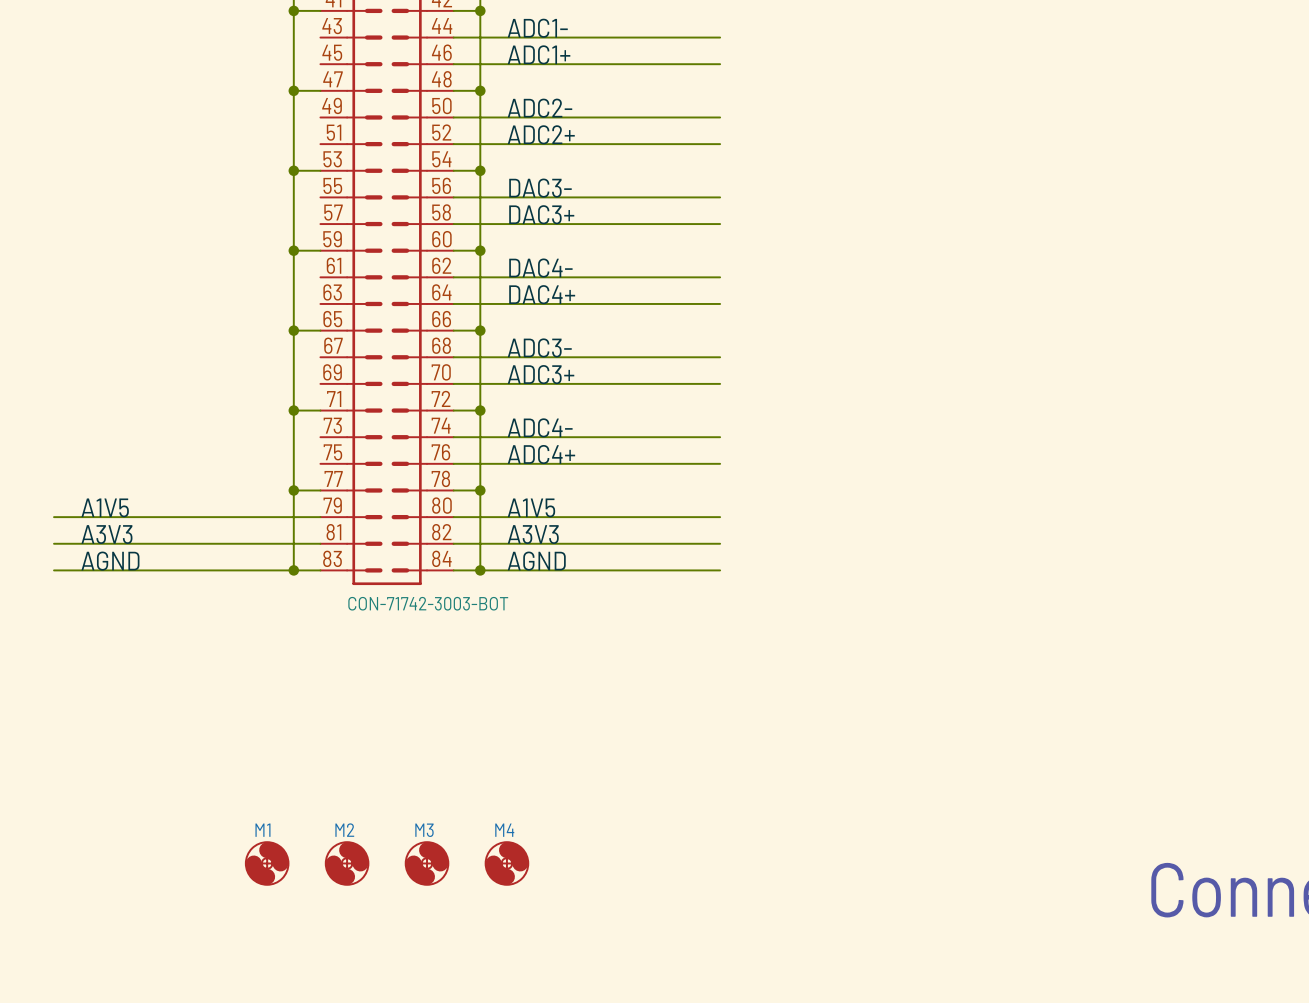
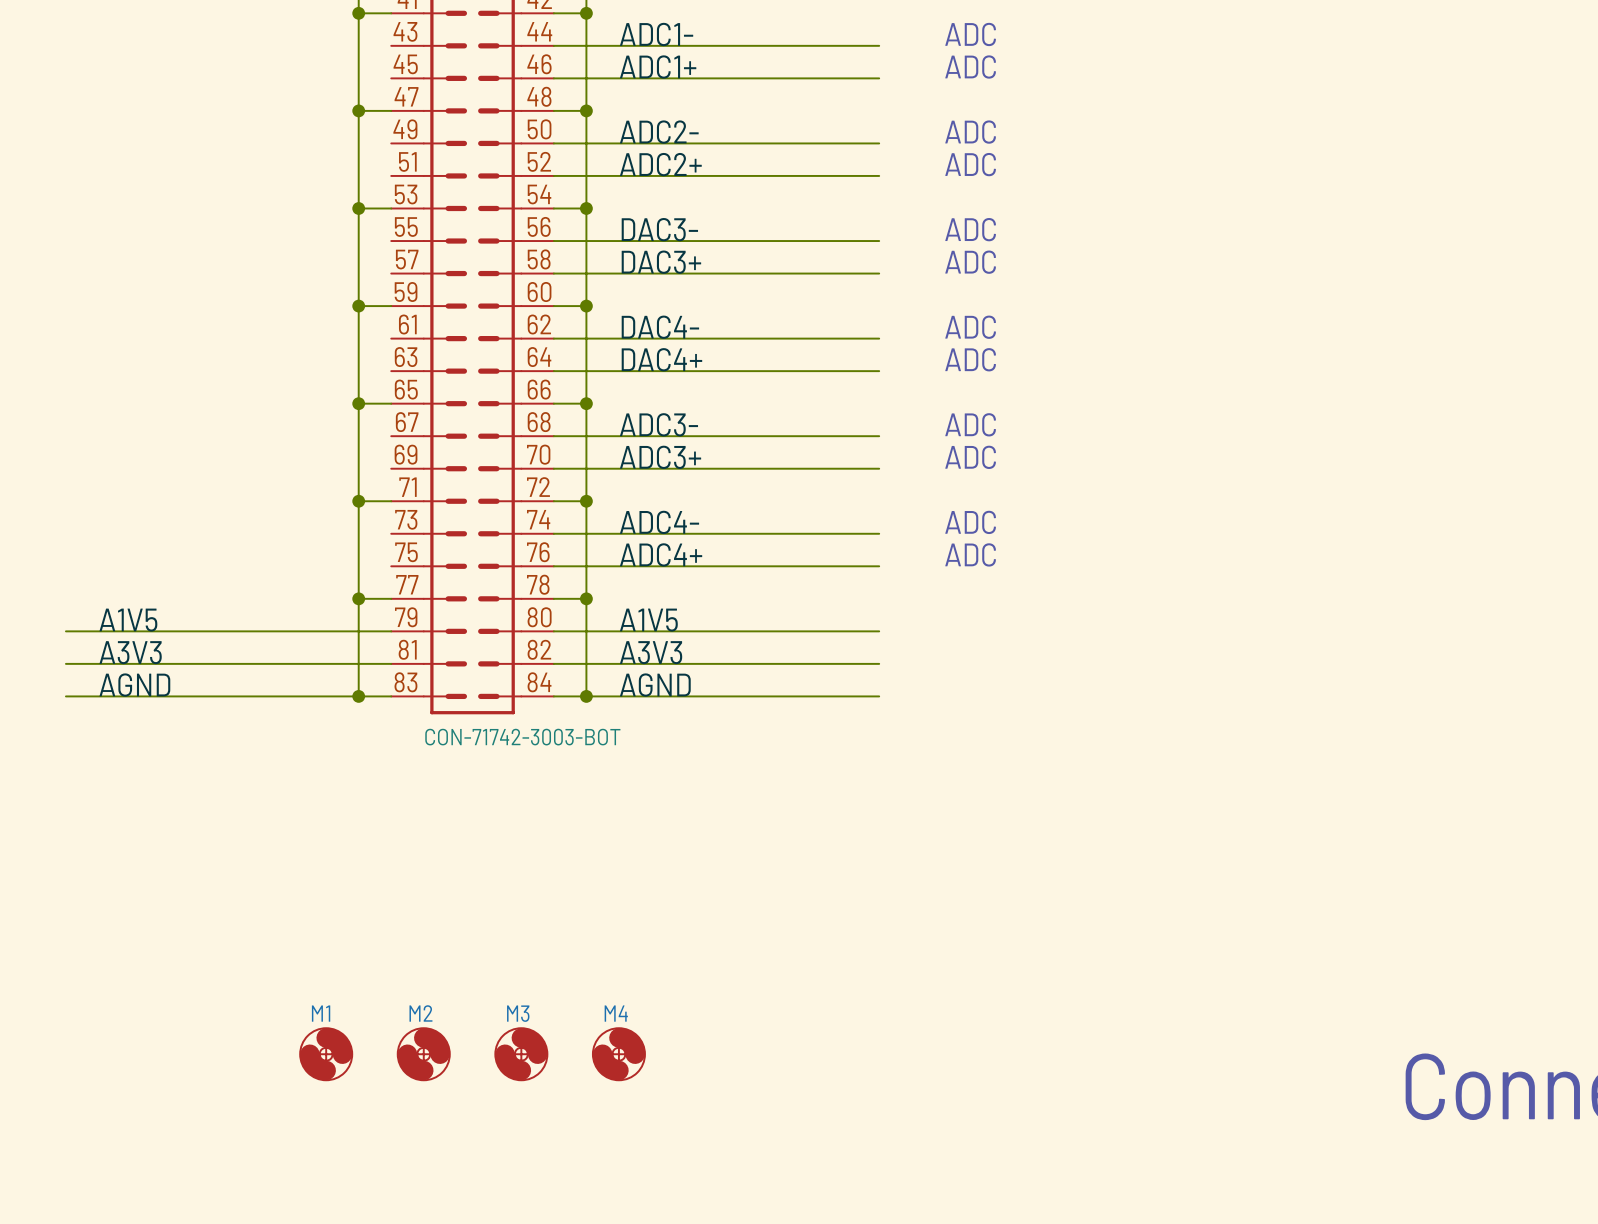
text: none -> ADC (970, 34)
text: none -> ADC (970, 67)
text: none -> ADC (970, 132)
text: none -> ADC (970, 164)
text: none -> ADC (970, 229)
text: none -> ADC (970, 262)
text: none -> ADC (970, 327)
text: none -> ADC (970, 359)
text: none -> ADC (970, 424)
text: none -> ADC (970, 457)
text: none -> ADC (970, 522)
text: none -> ADC (970, 554)

